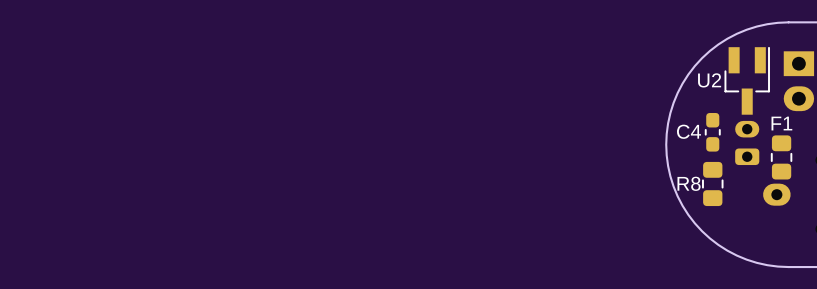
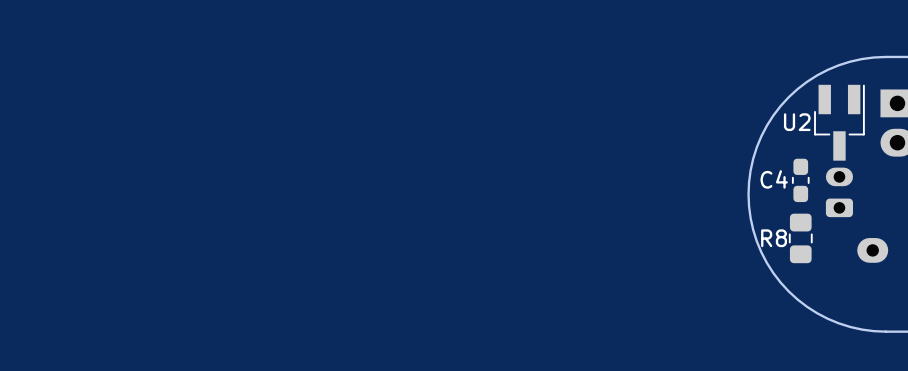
F1: (781, 157) -> none

